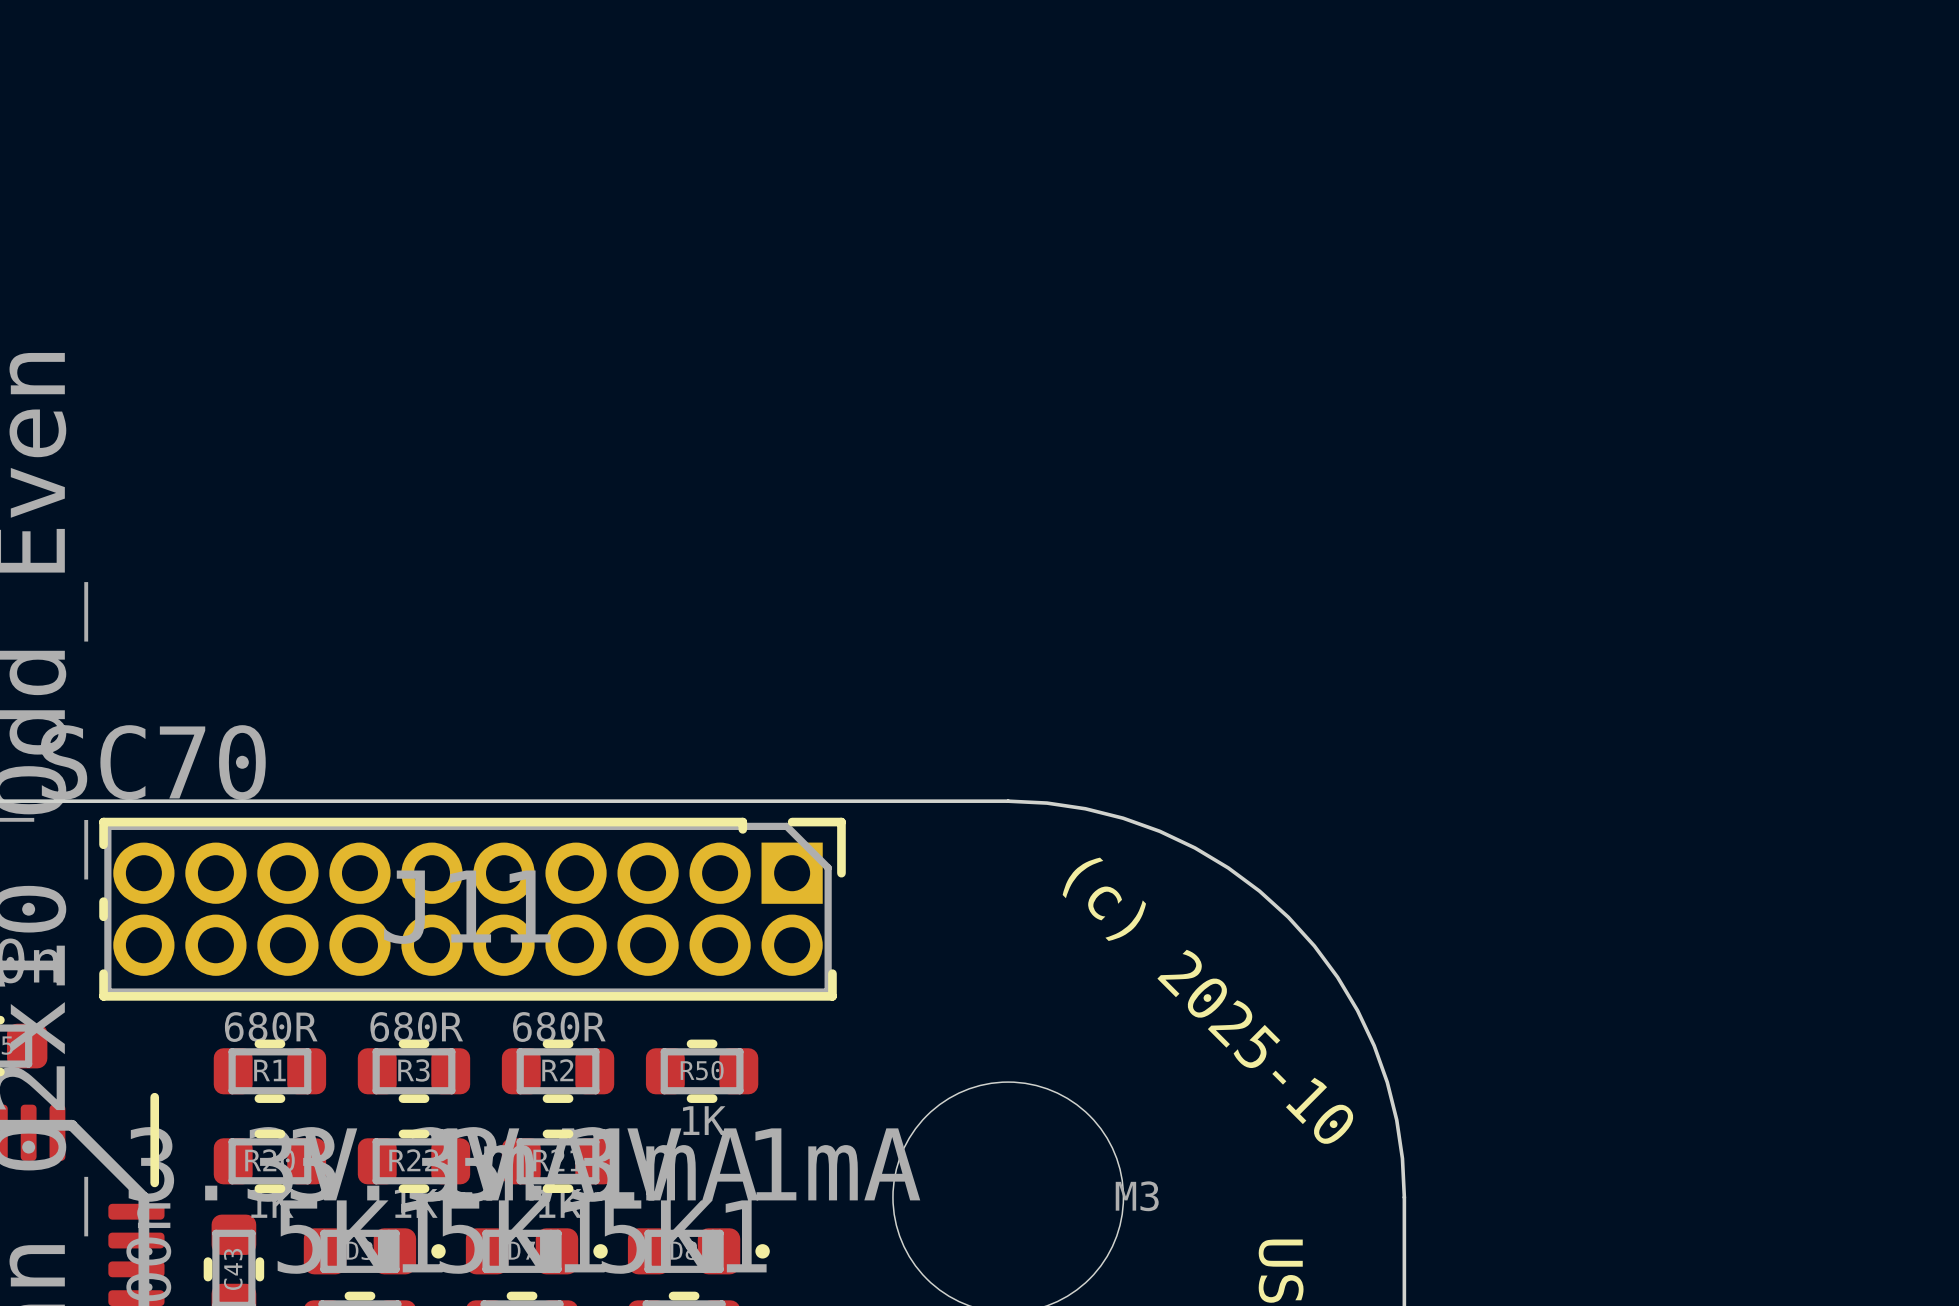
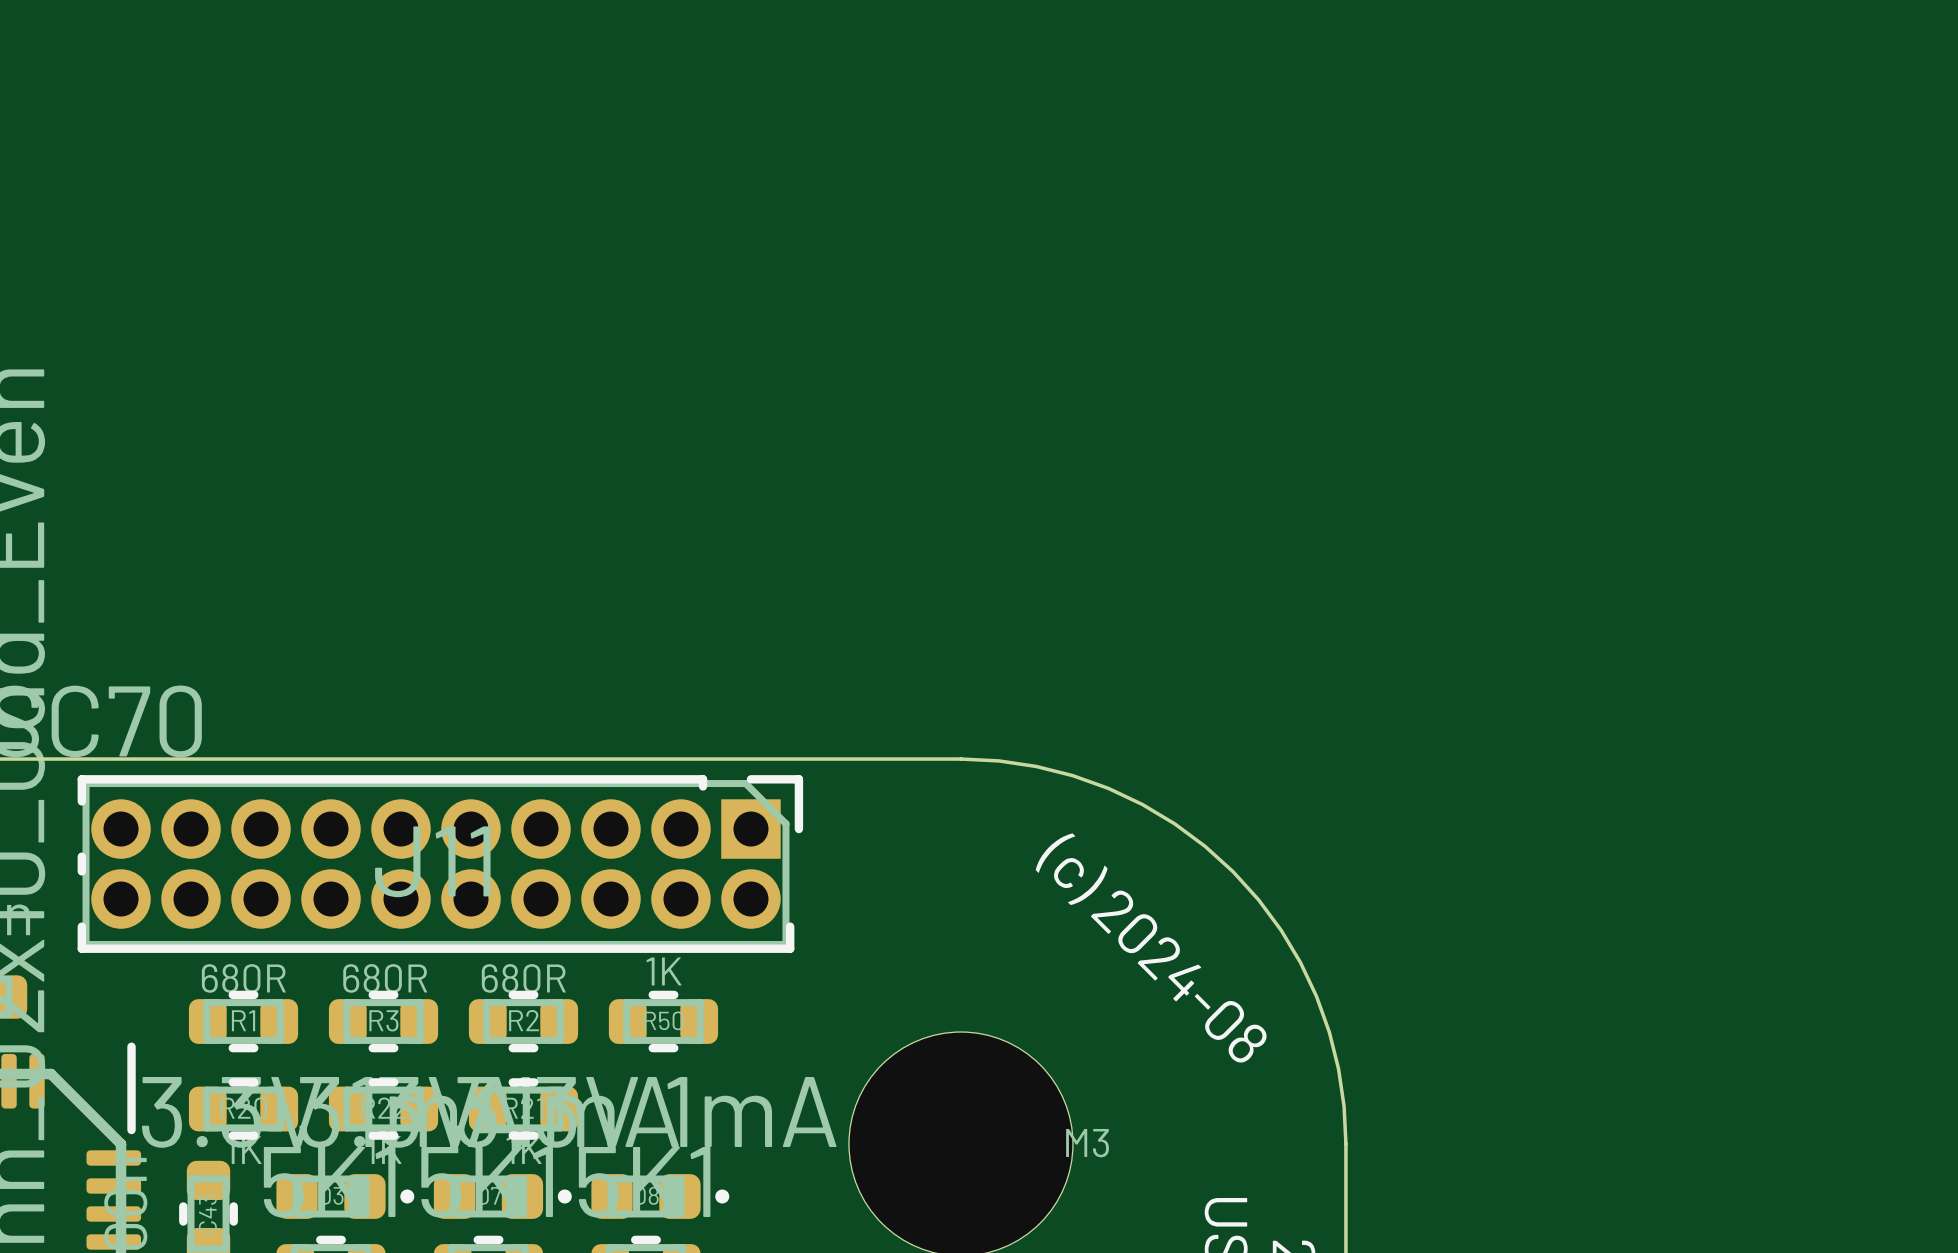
text: (c) 2025-10 (1208, 1001) -> (c) 2024-08 (1151, 948)
R50 value position: 1K (704, 1120) -> 1K (664, 971)

